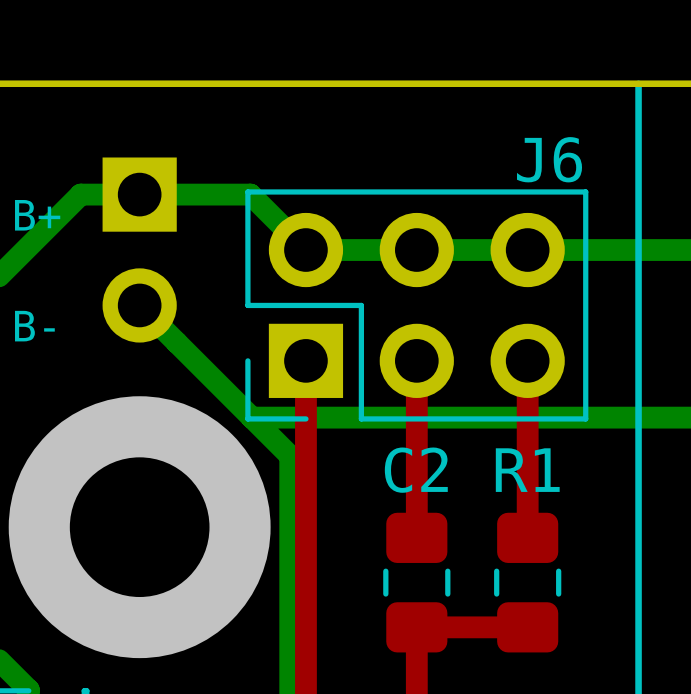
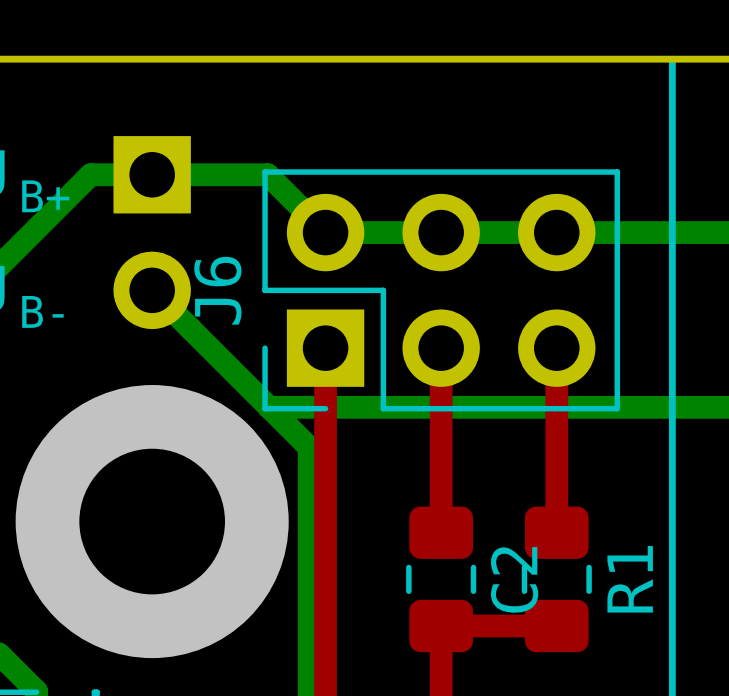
J6 name rotation: 0° (549, 159) -> 90° counterclockwise (217, 290)
J6 name position: J6 (549, 159) -> J6 (217, 290)
C2 name rotation: 0° (416, 470) -> 90° counterclockwise (514, 579)
C2 name position: C2 (416, 470) -> C2 (514, 579)
R1 name rotation: 0° (527, 470) -> 90° counterclockwise (630, 579)
R1 name position: R1 (527, 470) -> R1 (630, 579)

